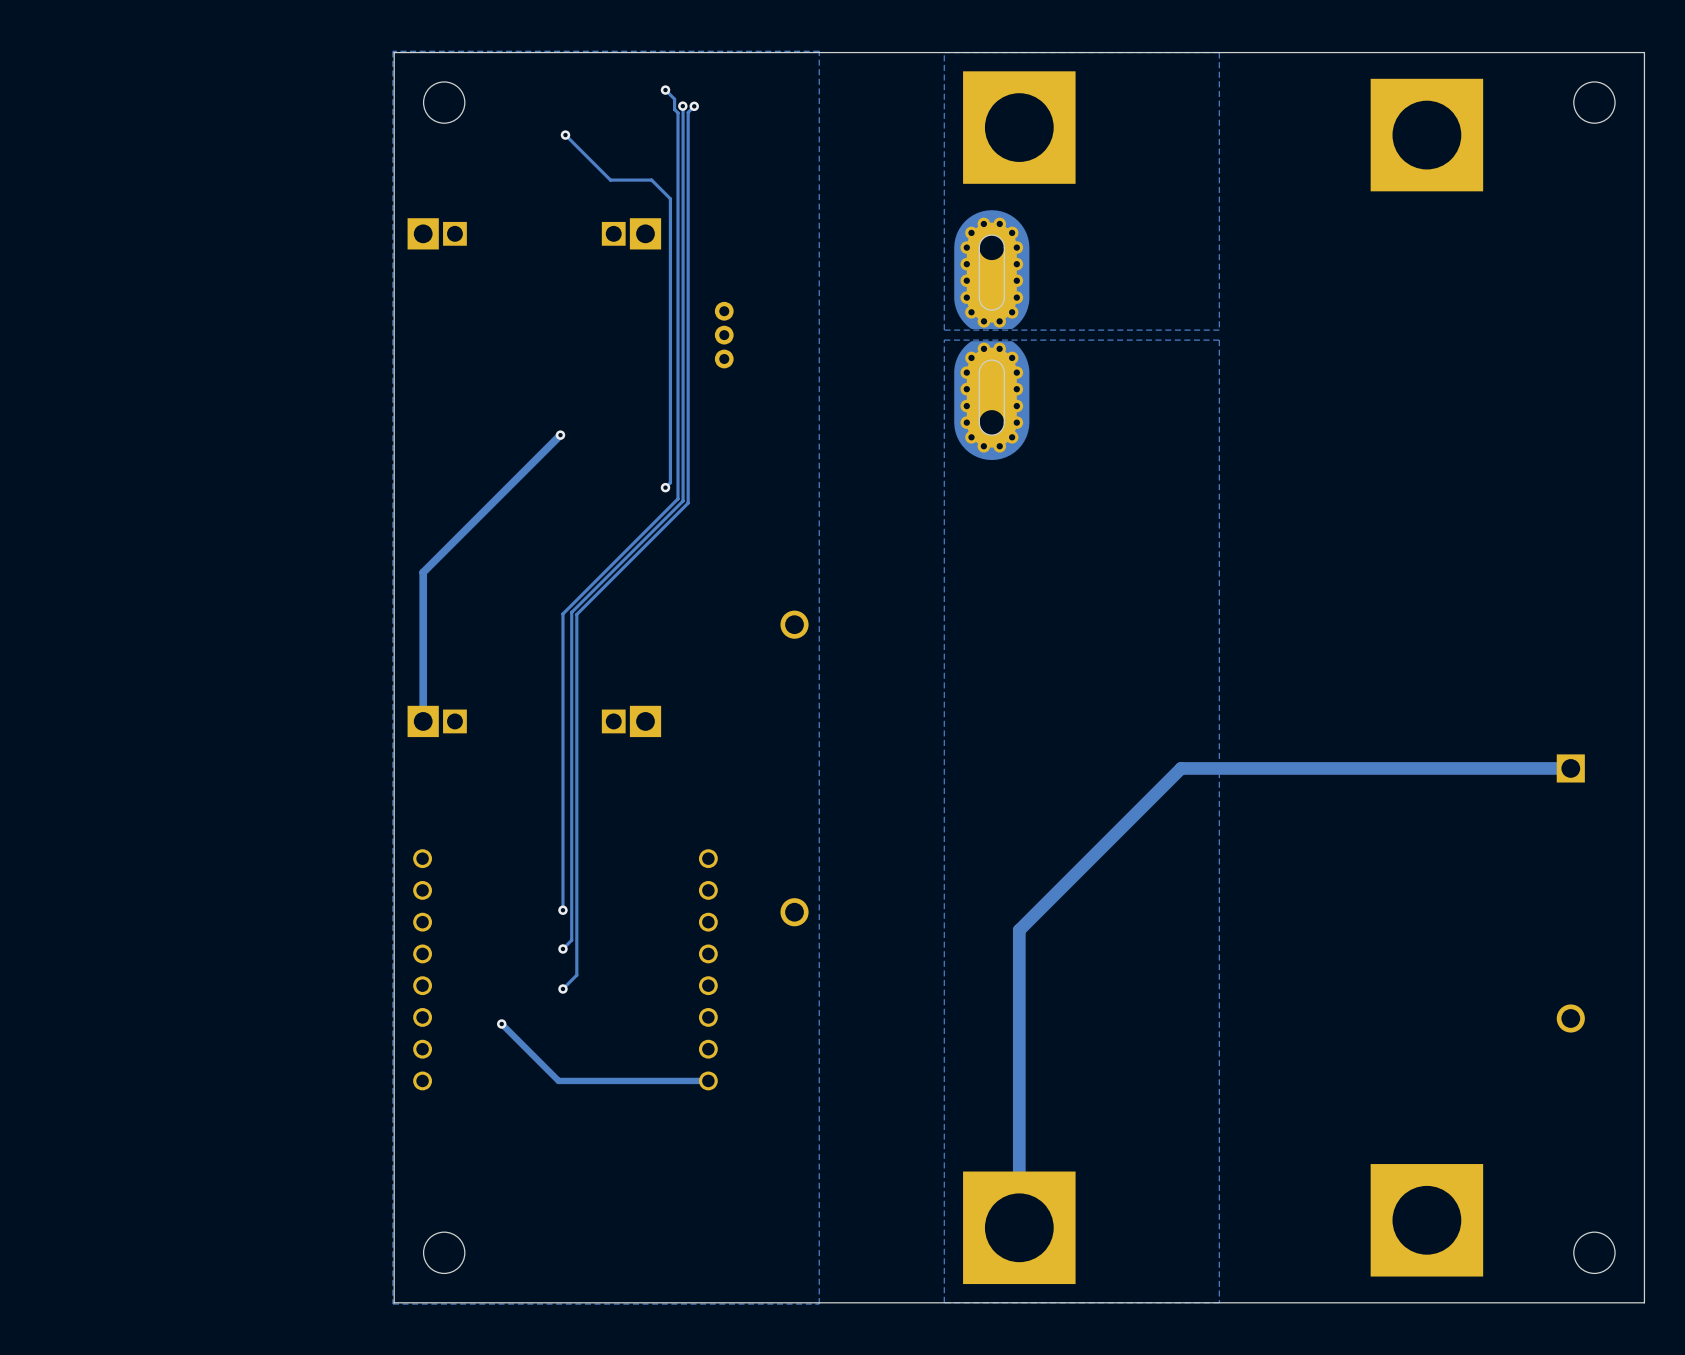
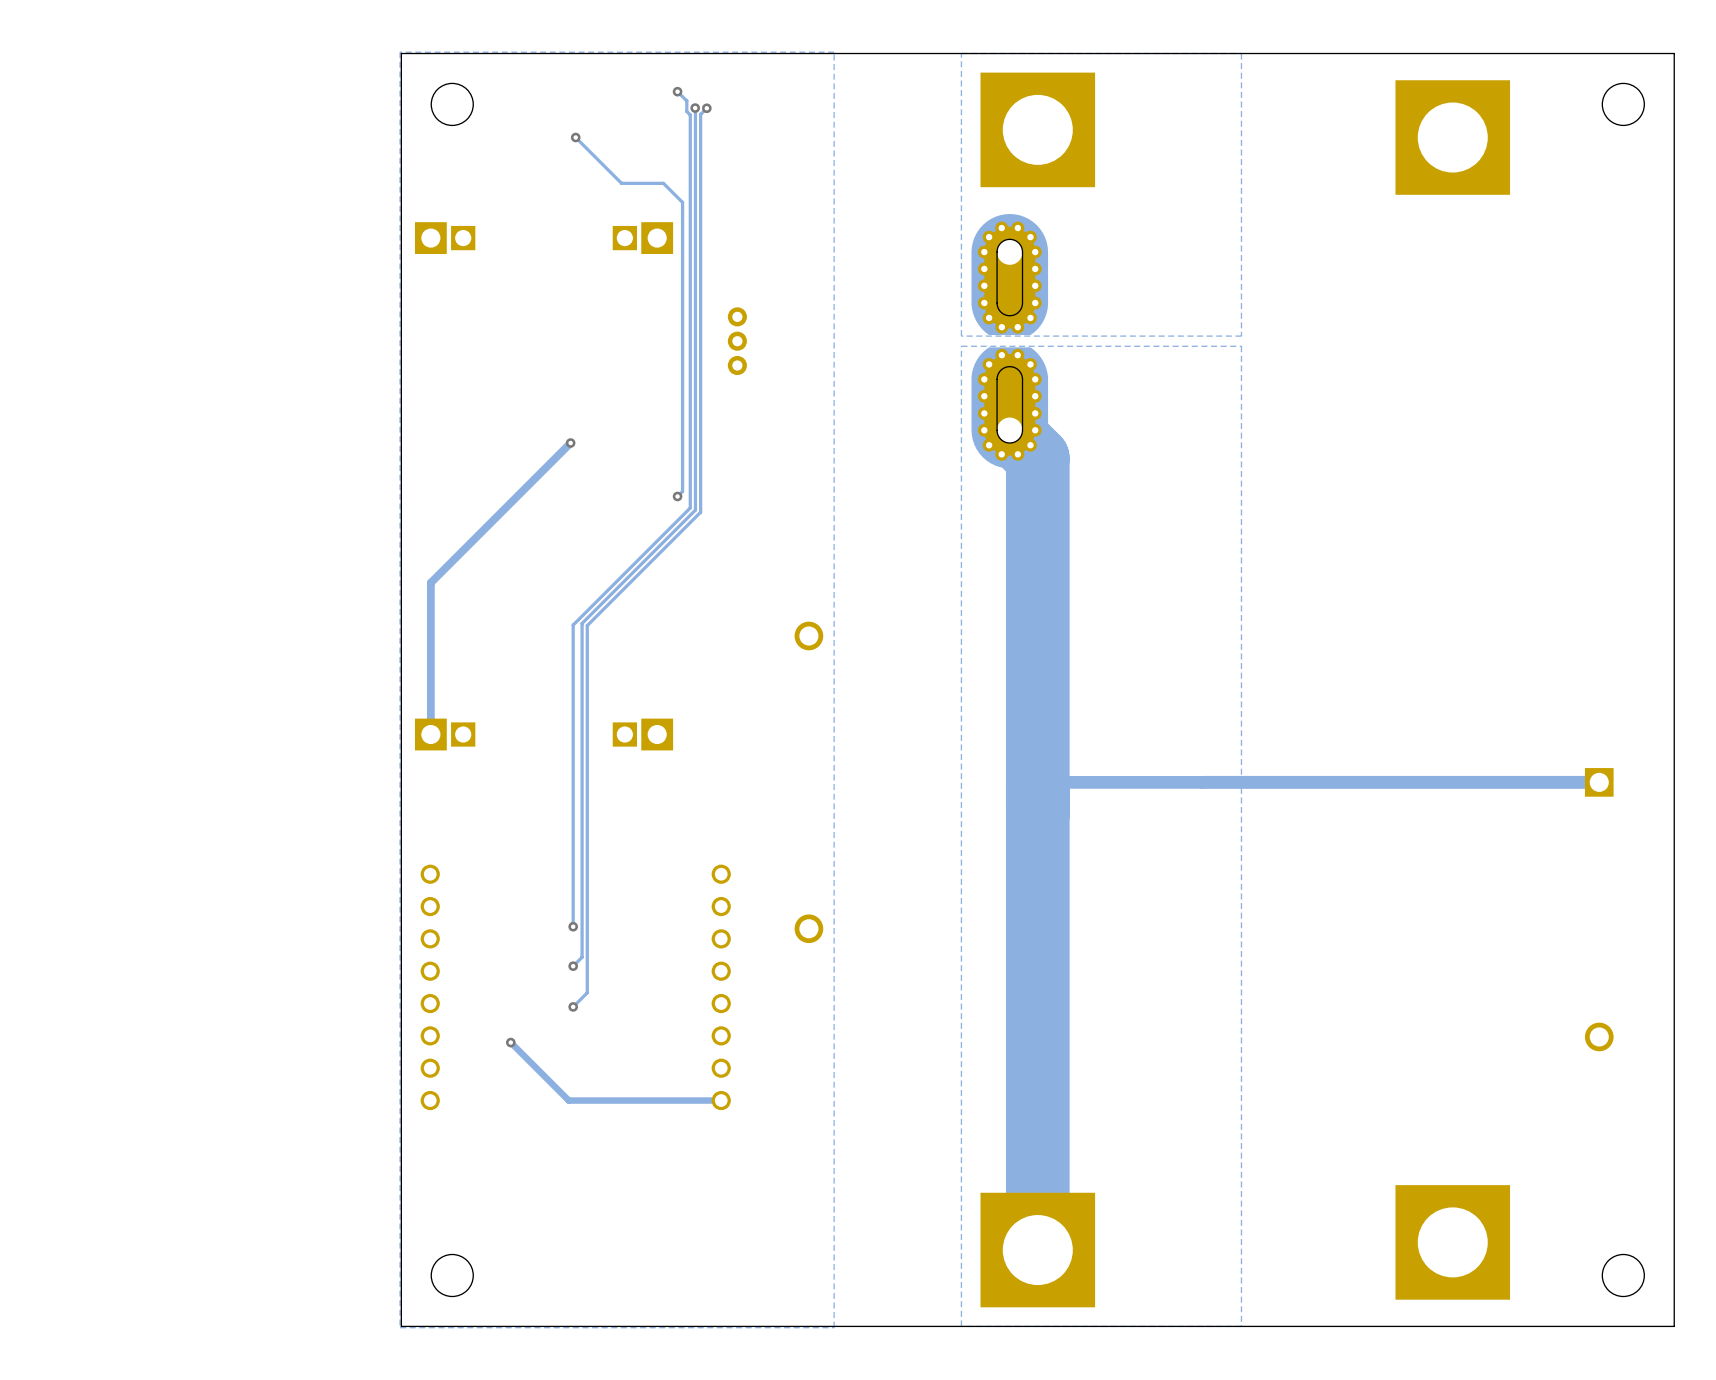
track: none -> (1009, 430) (1037, 458) (1037, 947)
track: (1181, 768) (1019, 930) -> (1202, 782) (1037, 782)
track width: thin (1019, 930) (1019, 1227) -> thick (1037, 947) (1037, 1250)

